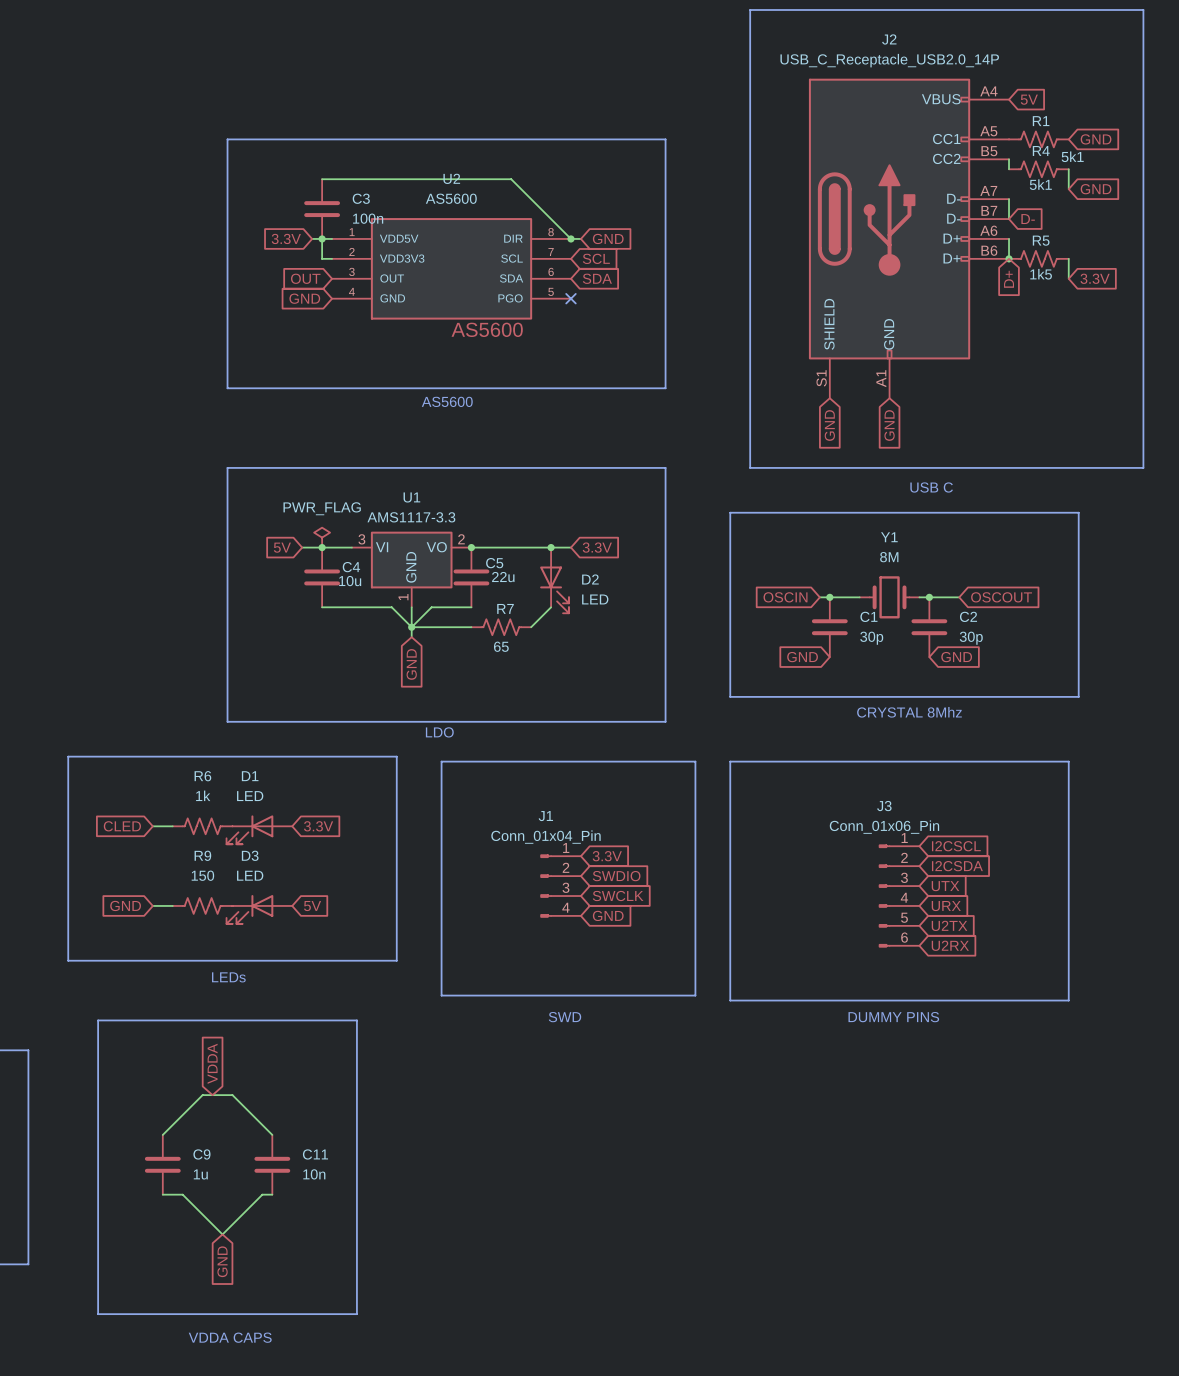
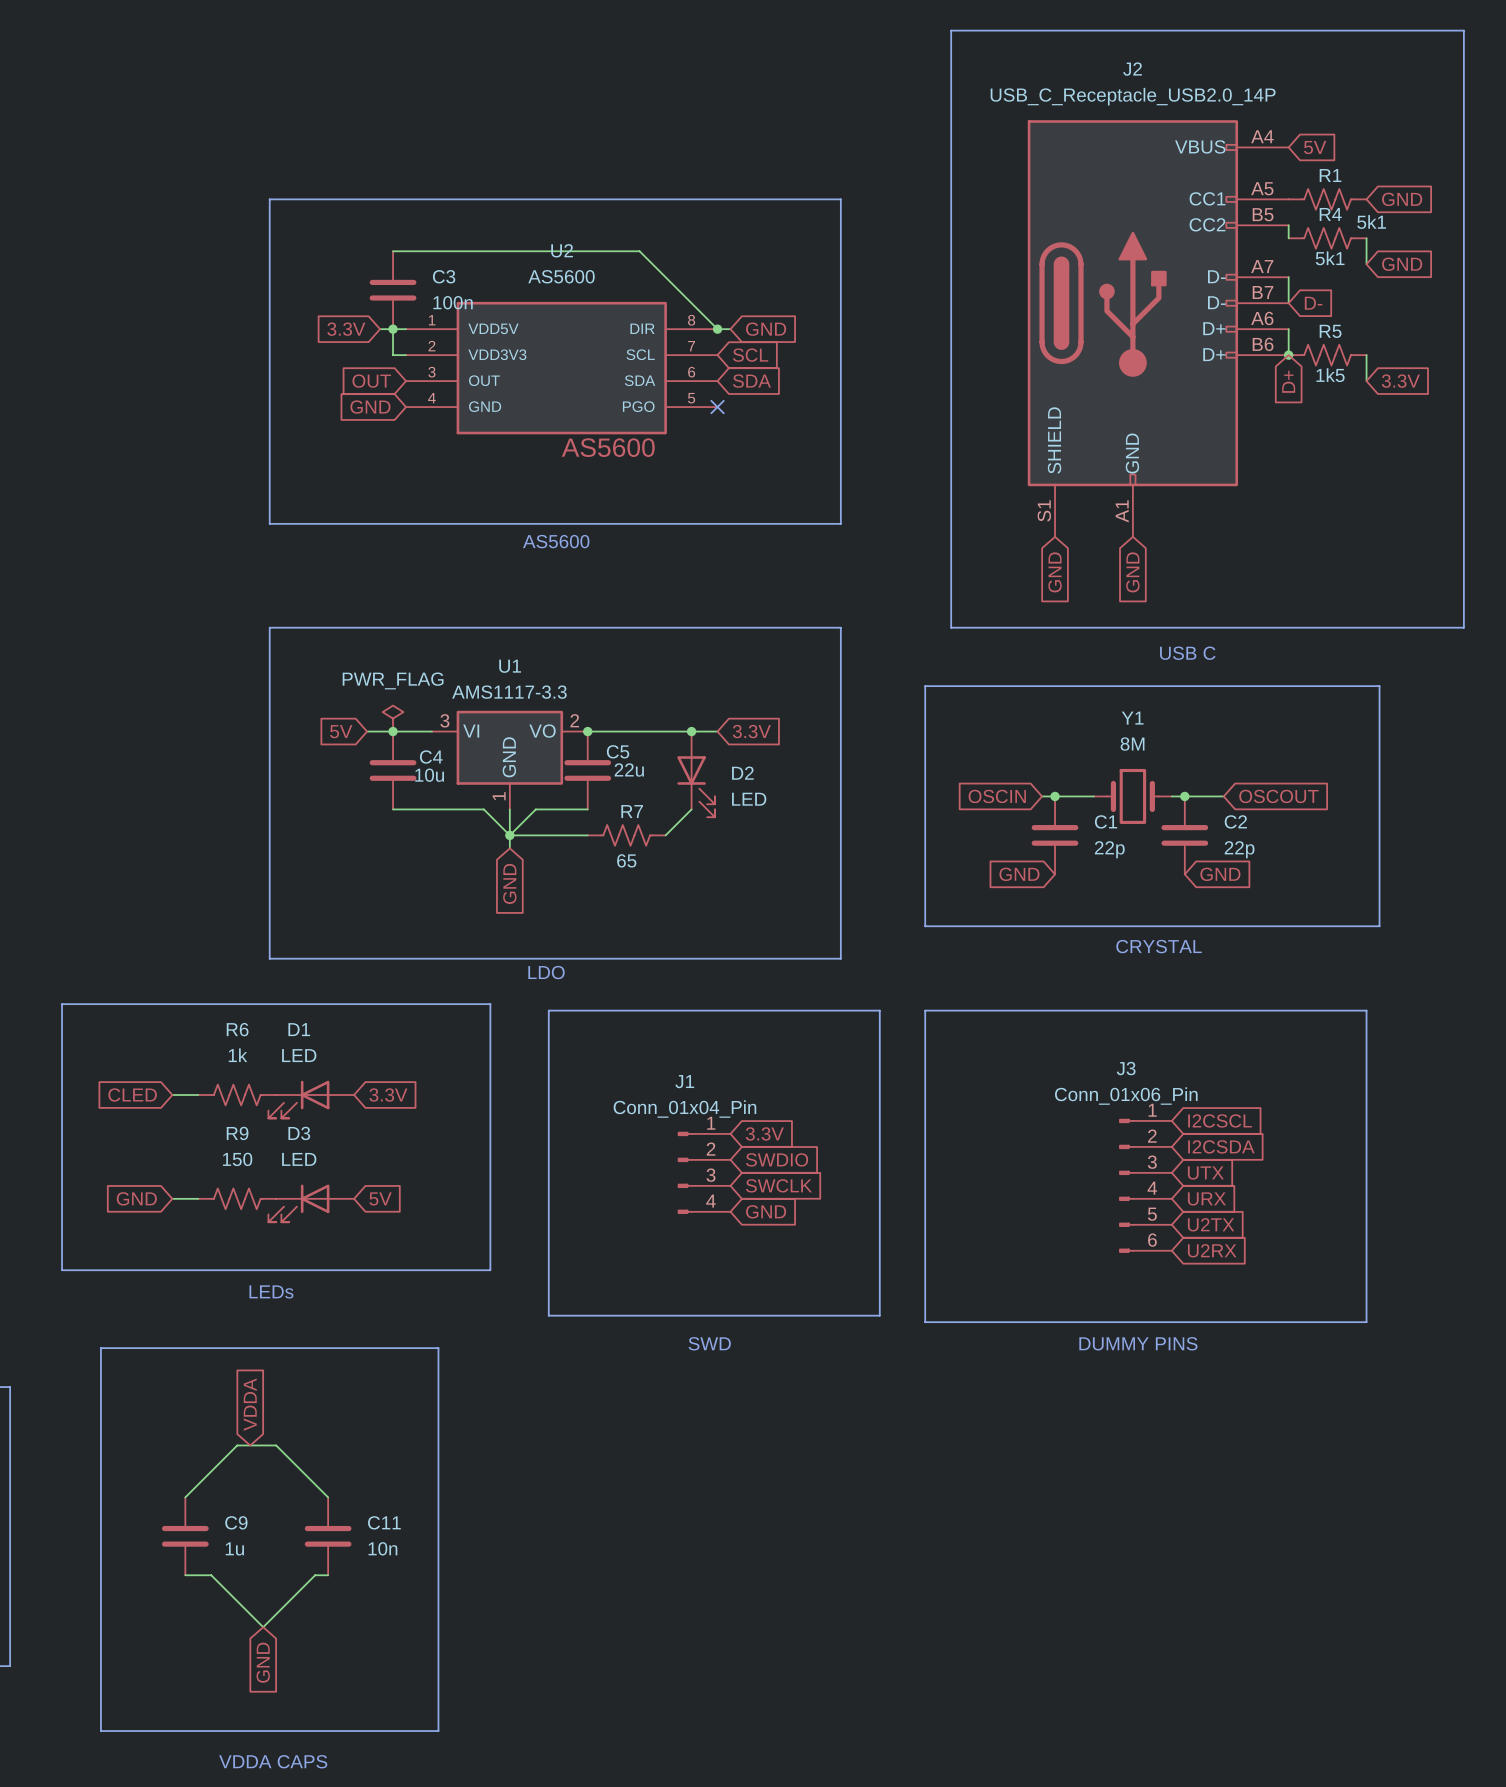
C1 value: 30p (871, 638) -> 22p (1109, 849)
C2 value: 30p (971, 638) -> 22p (1239, 849)
text: CRYSTAL 8Mhz (909, 712) -> CRYSTAL (1159, 946)

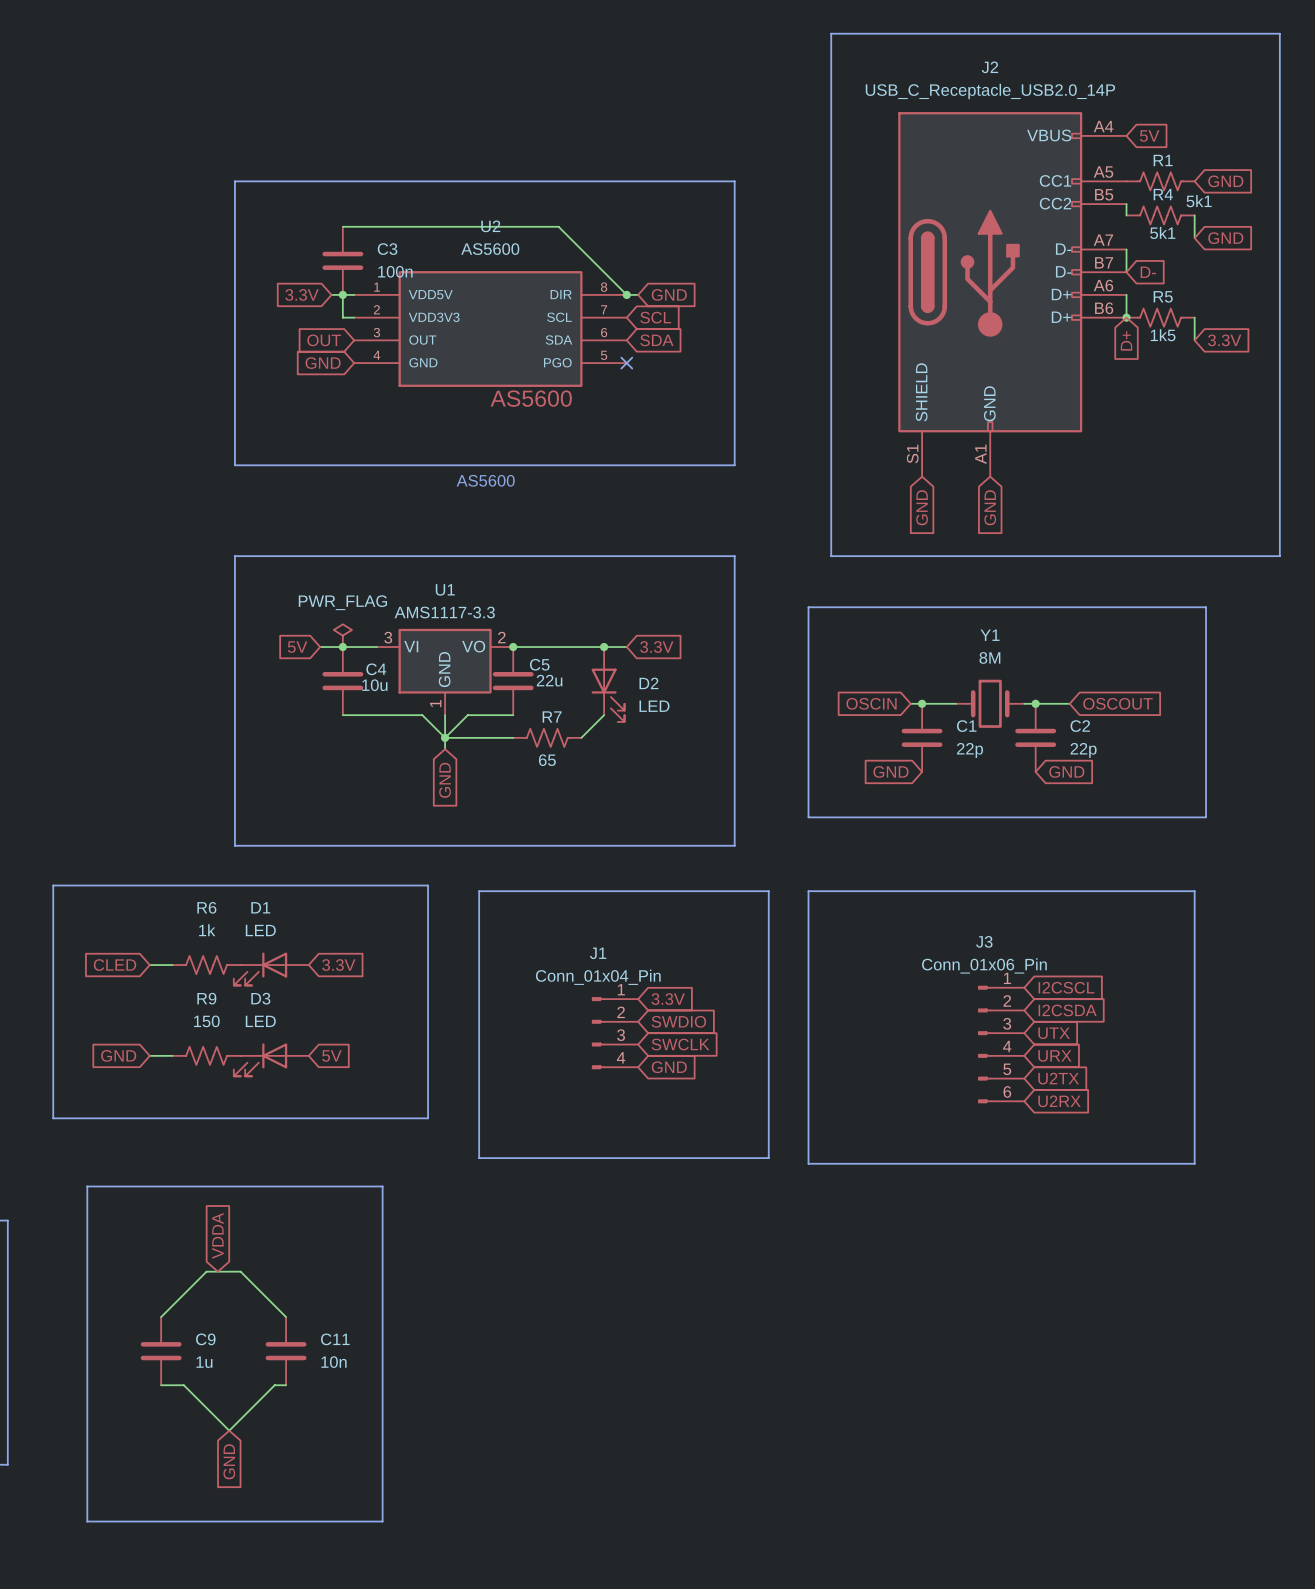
text: USB C (1187, 653) -> none
text: CRYSTAL (1159, 946) -> none
text: LDO (546, 972) -> none
text: LEDs (271, 1291) -> none
text: SWD (709, 1343) -> none
text: DUMMY PINS (1138, 1343) -> none
text: VDDA CAPS (273, 1761) -> none

